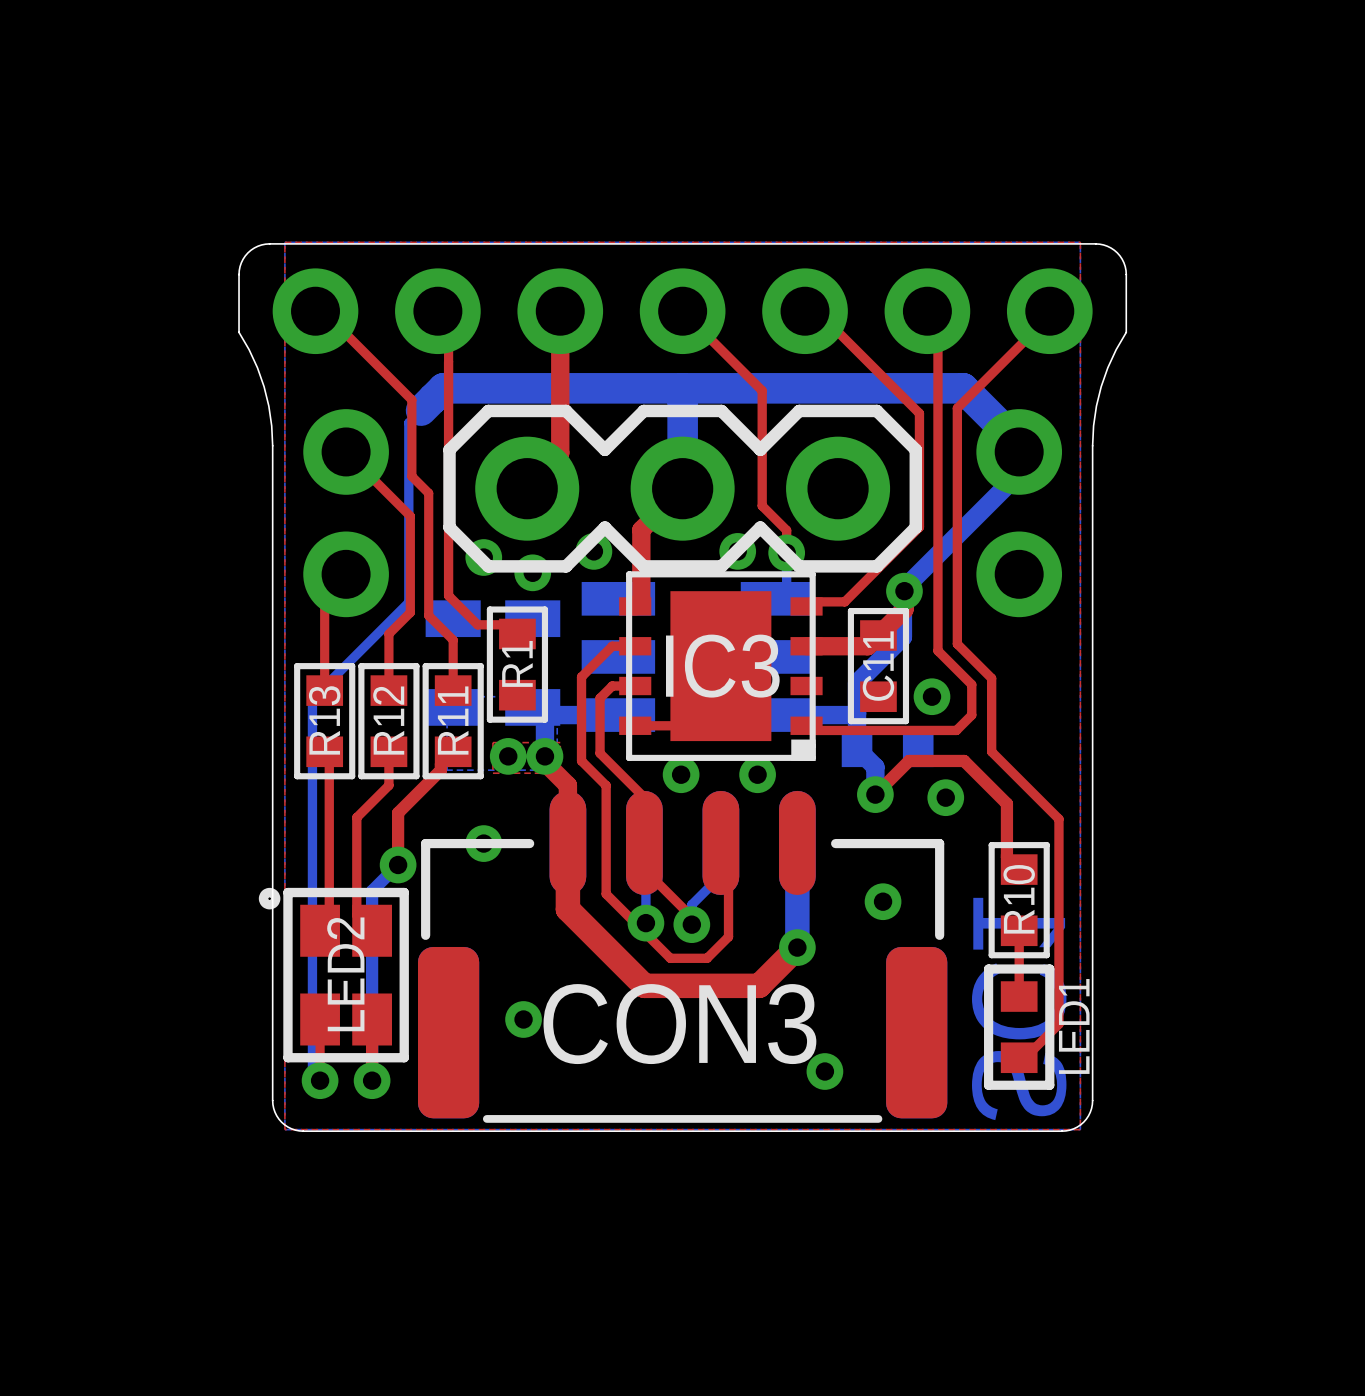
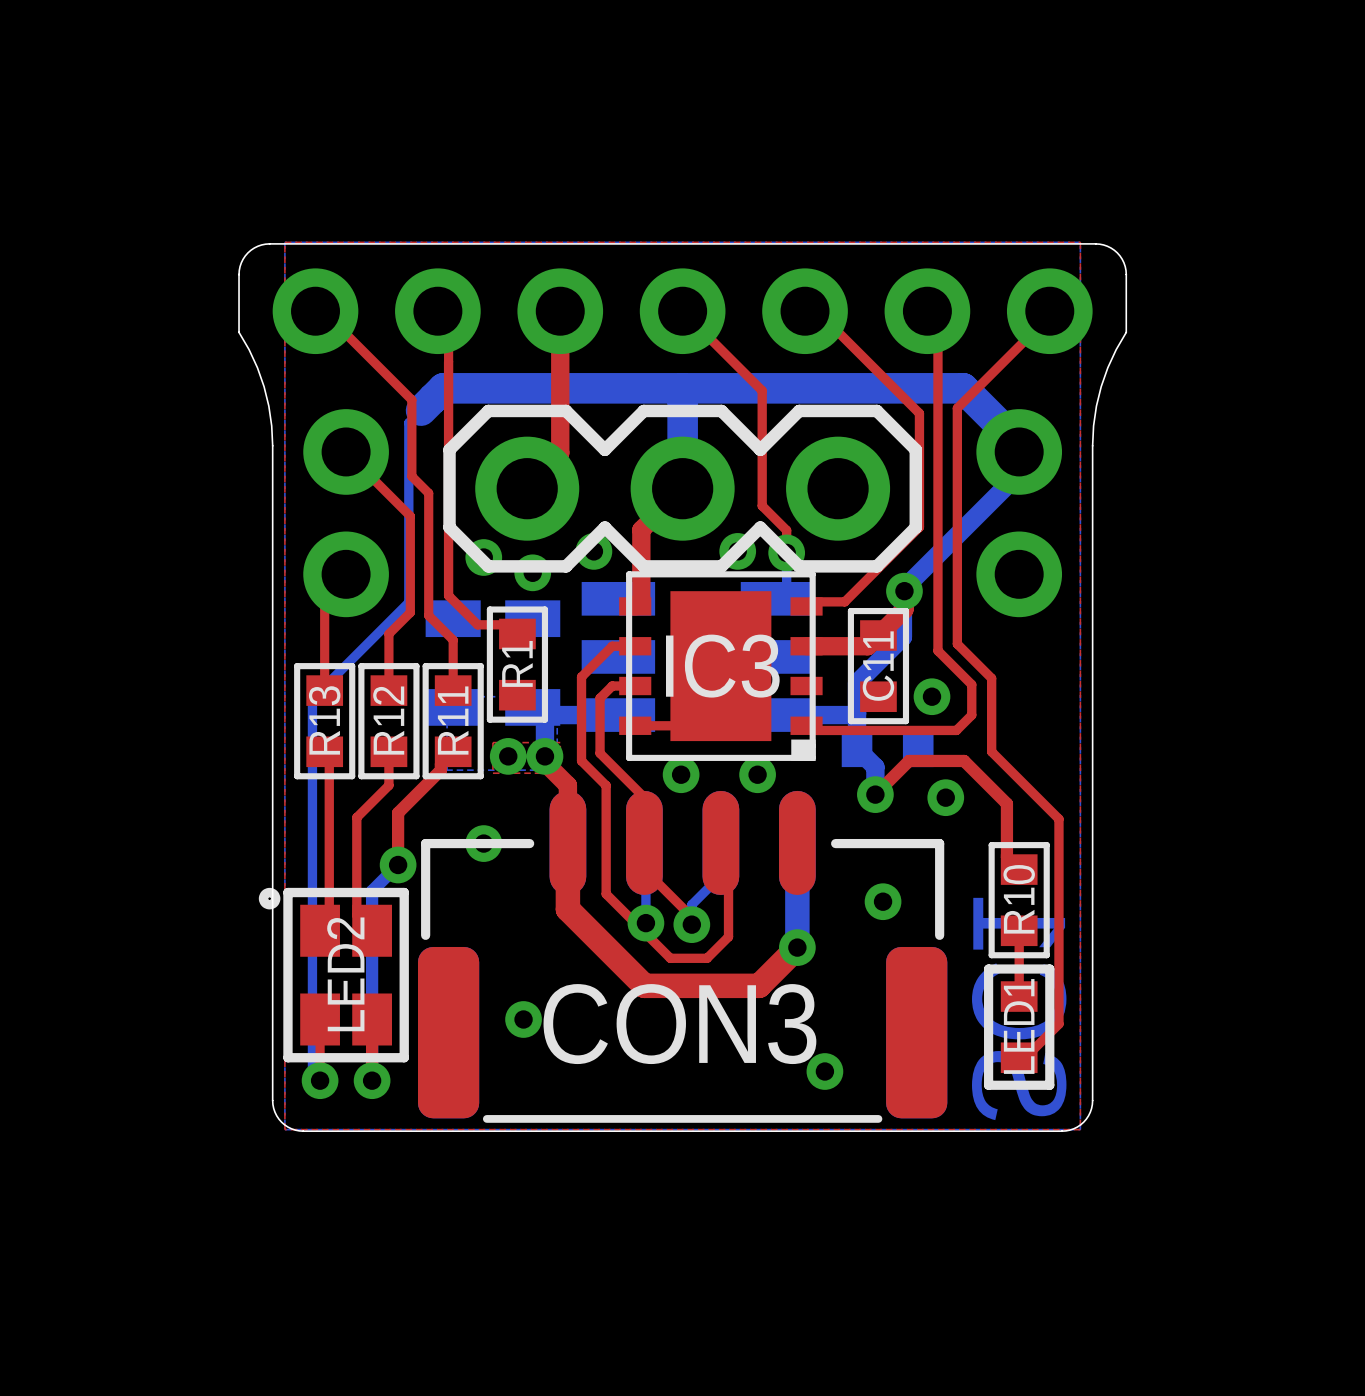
LED1 name position: LED1 (1074, 1026) -> LED1 (1019, 1026)

